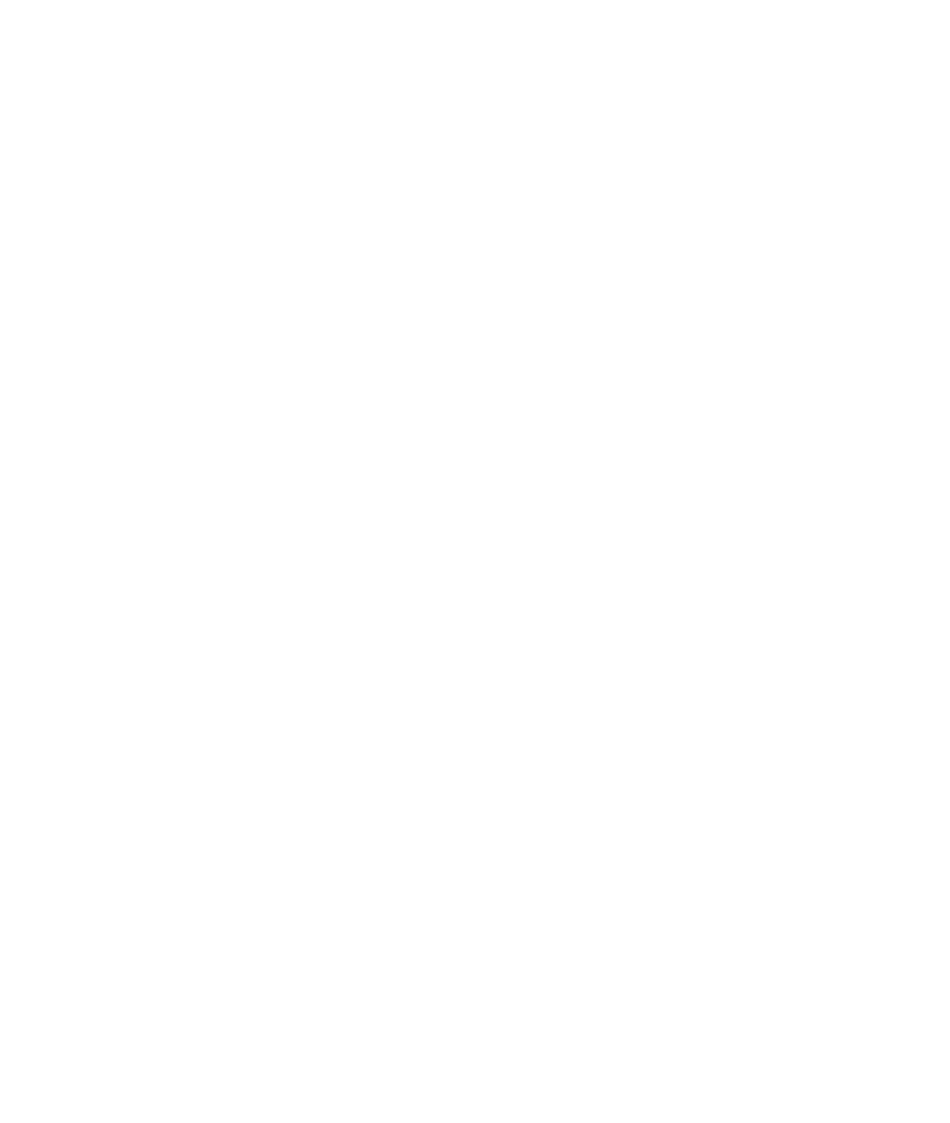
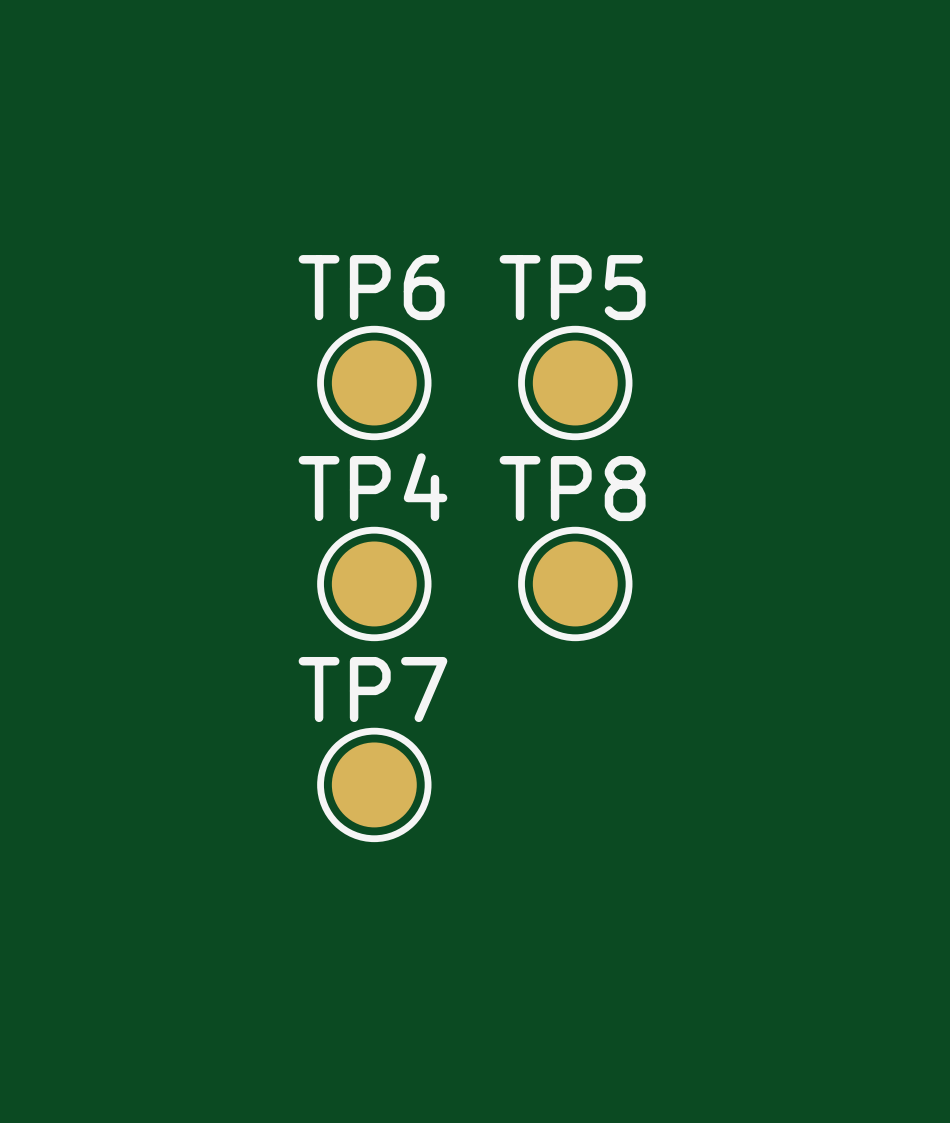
TP6: none -> (374, 383)
TP5: none -> (575, 383)
TP4: none -> (374, 583)
TP8: none -> (575, 583)
TP7: none -> (374, 784)

